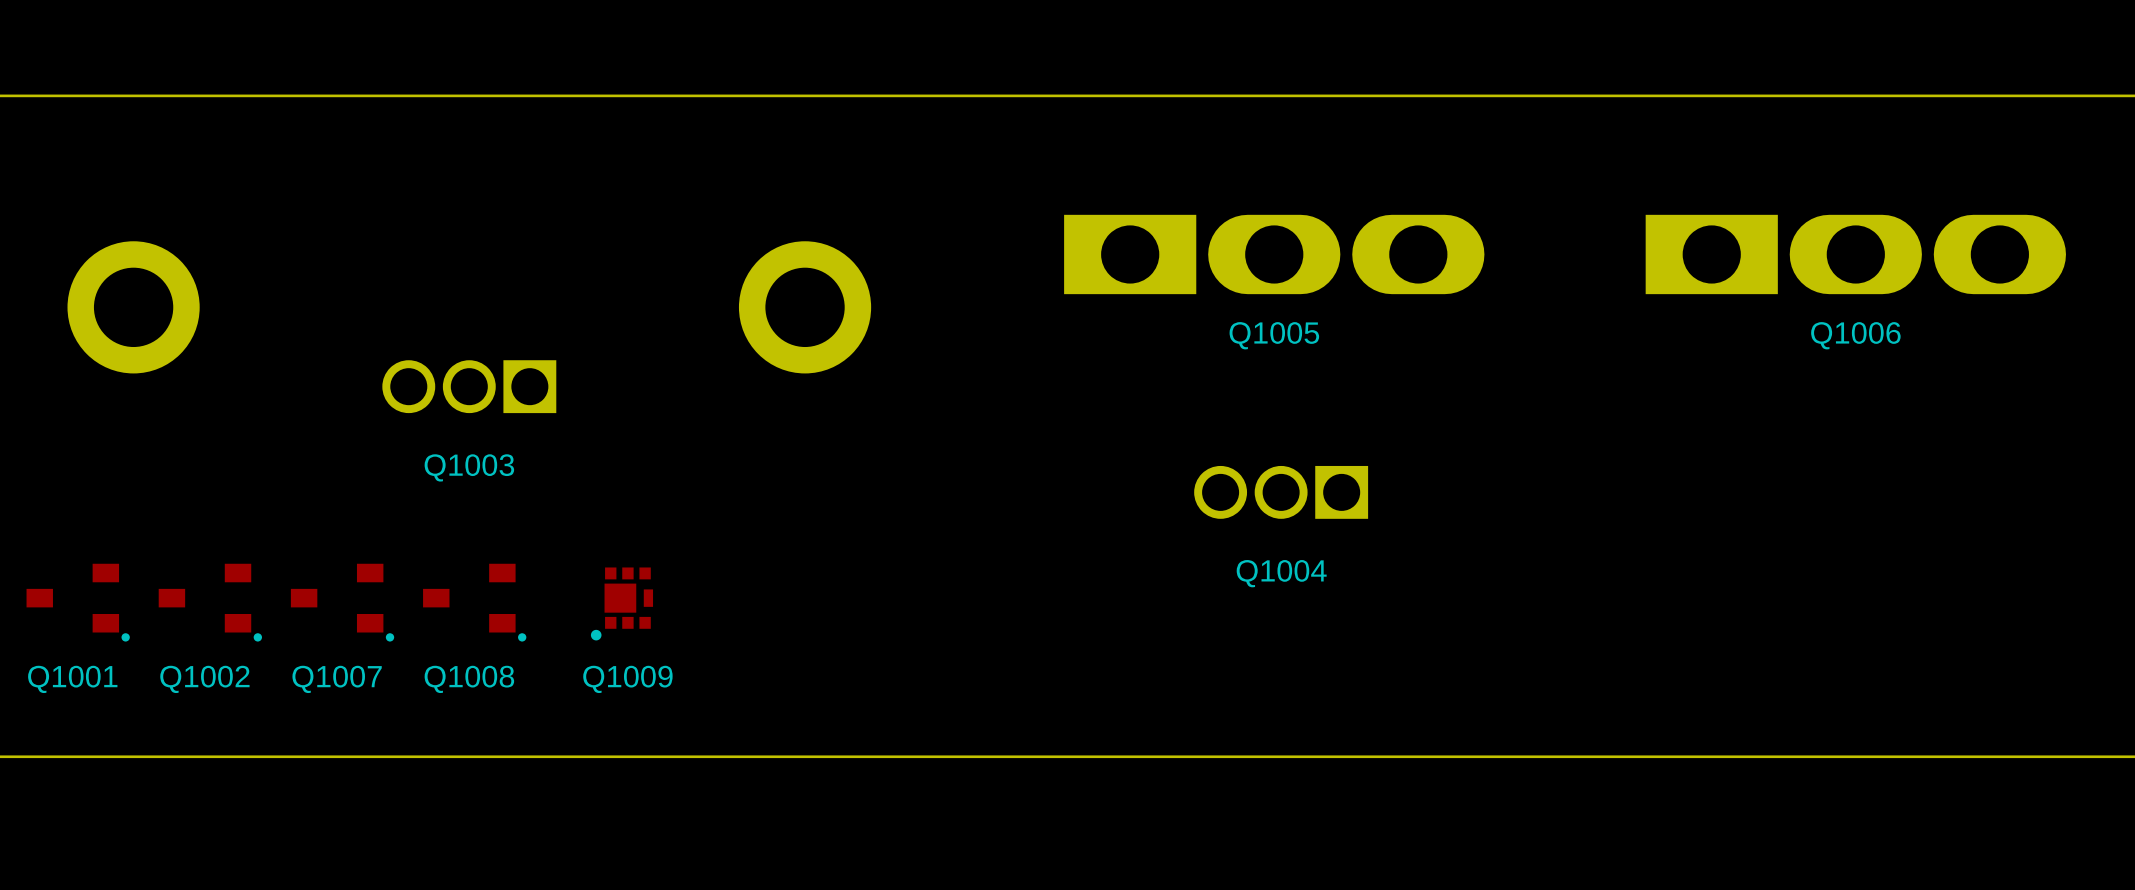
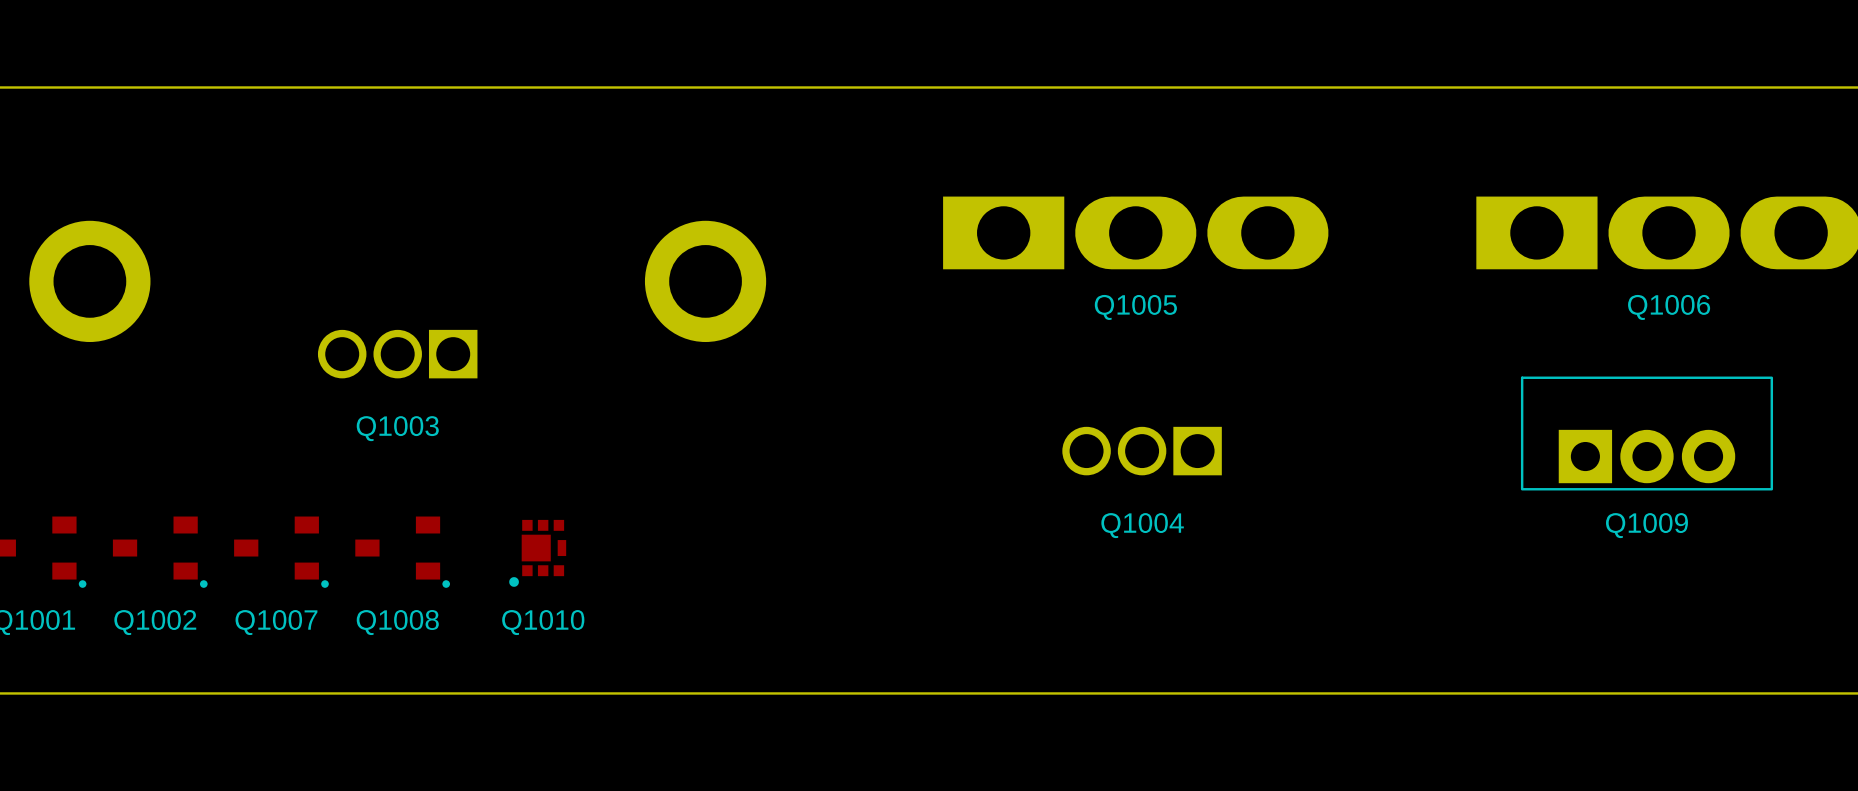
Q1009: none -> (1646, 433)
Q1009 name: Q1009 (627, 679) -> Q1010 (543, 622)

